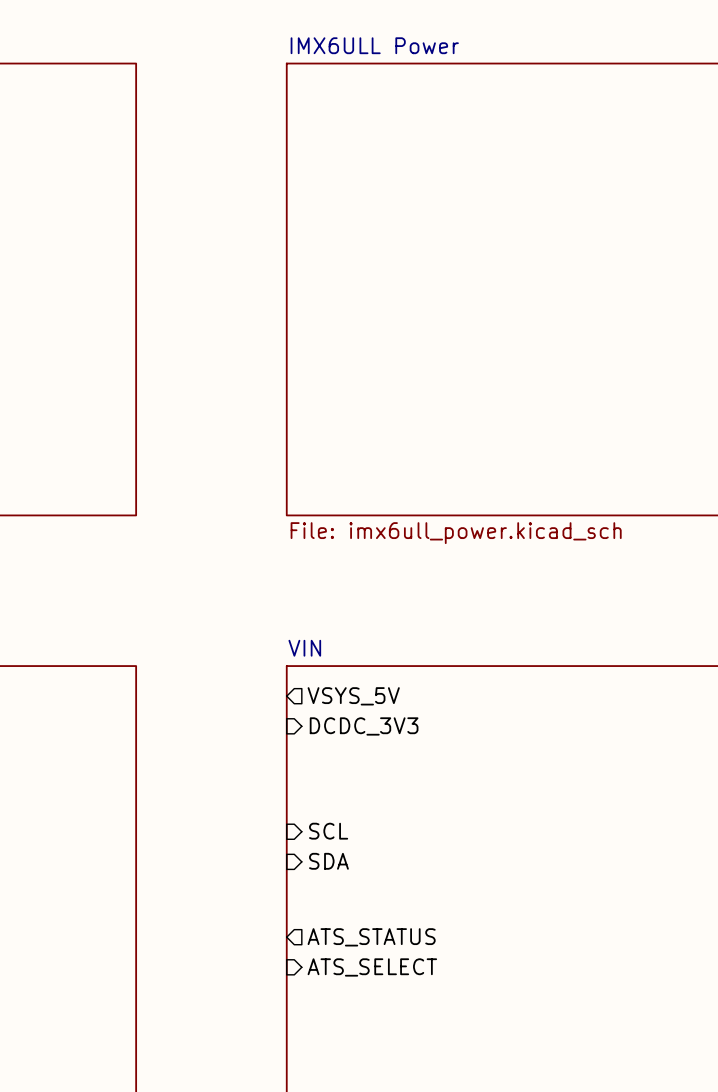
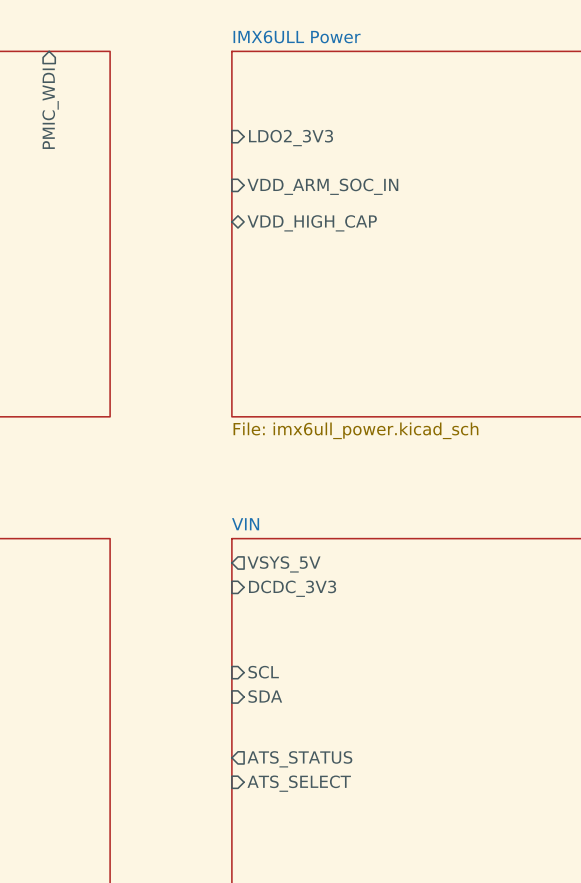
sheet pin: none -> PMIC_WDI (50, 108)
sheet pin: none -> LDO2_3V3 (291, 138)
sheet pin: none -> VDD_ARM_SOC_IN (322, 186)
sheet pin: none -> VDD_HIGH_CAP (312, 223)

